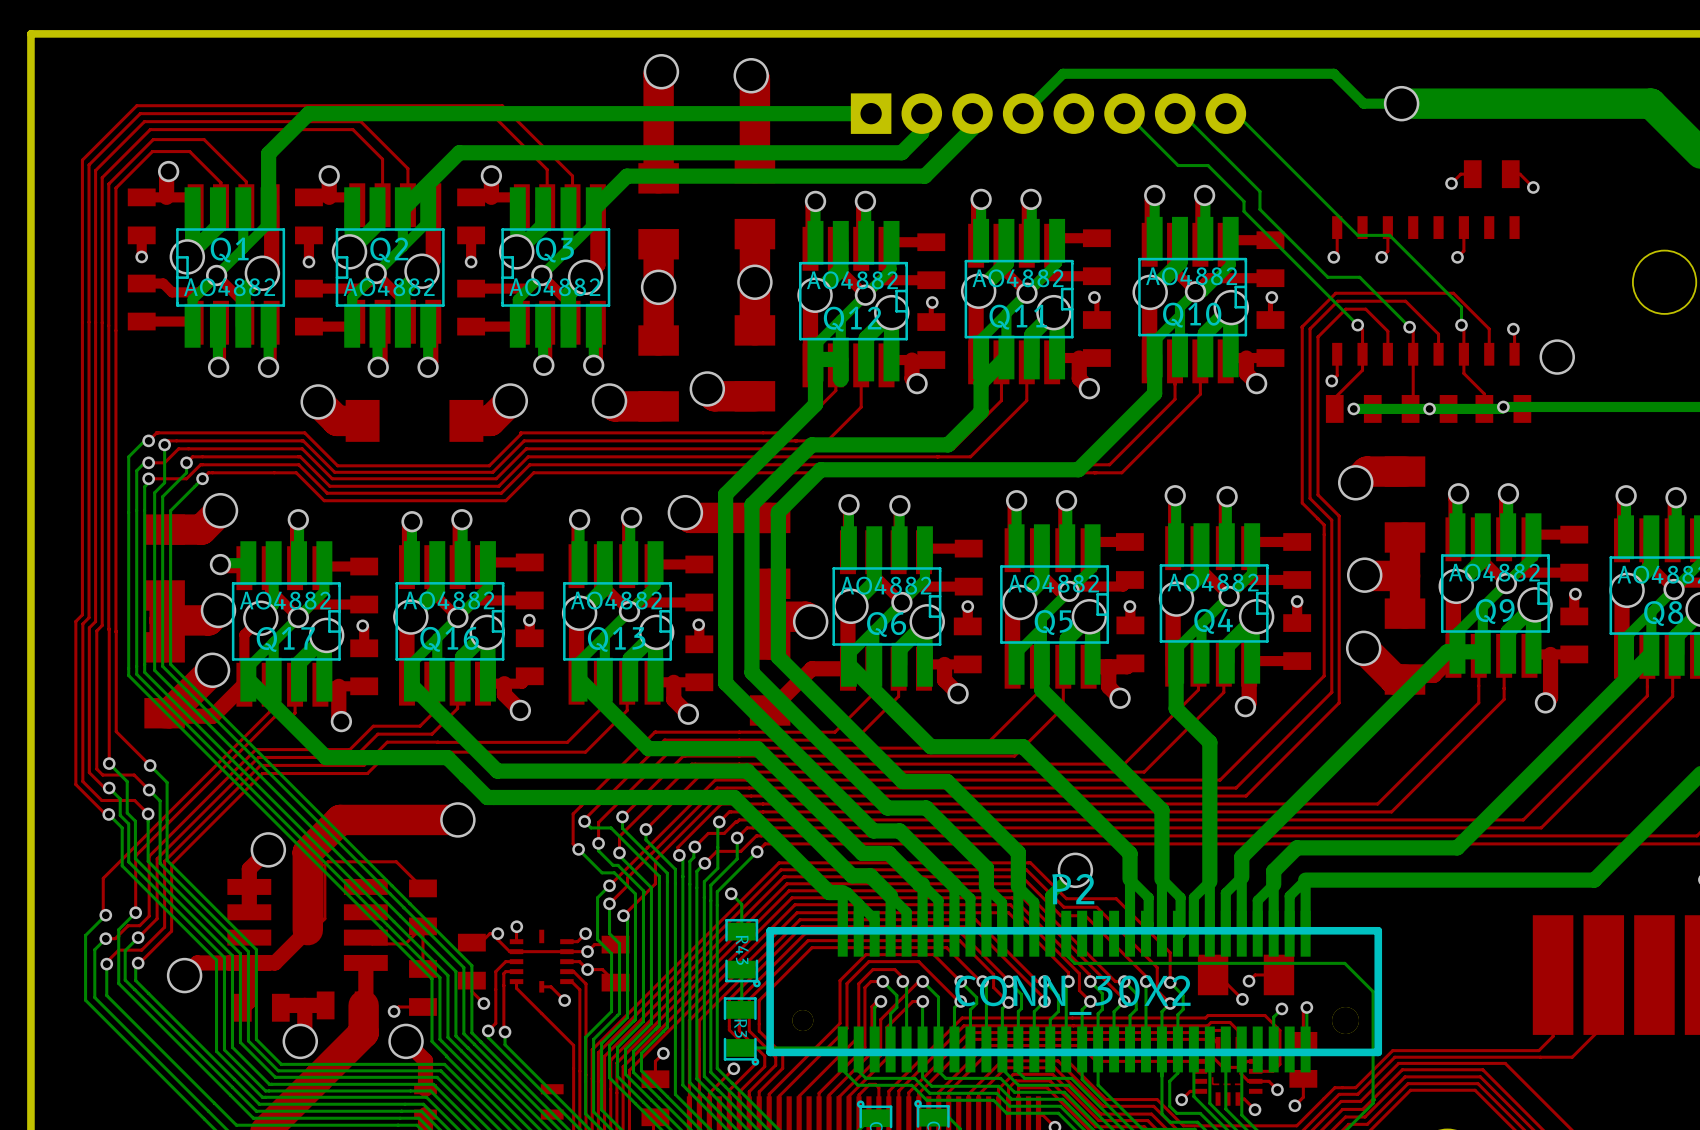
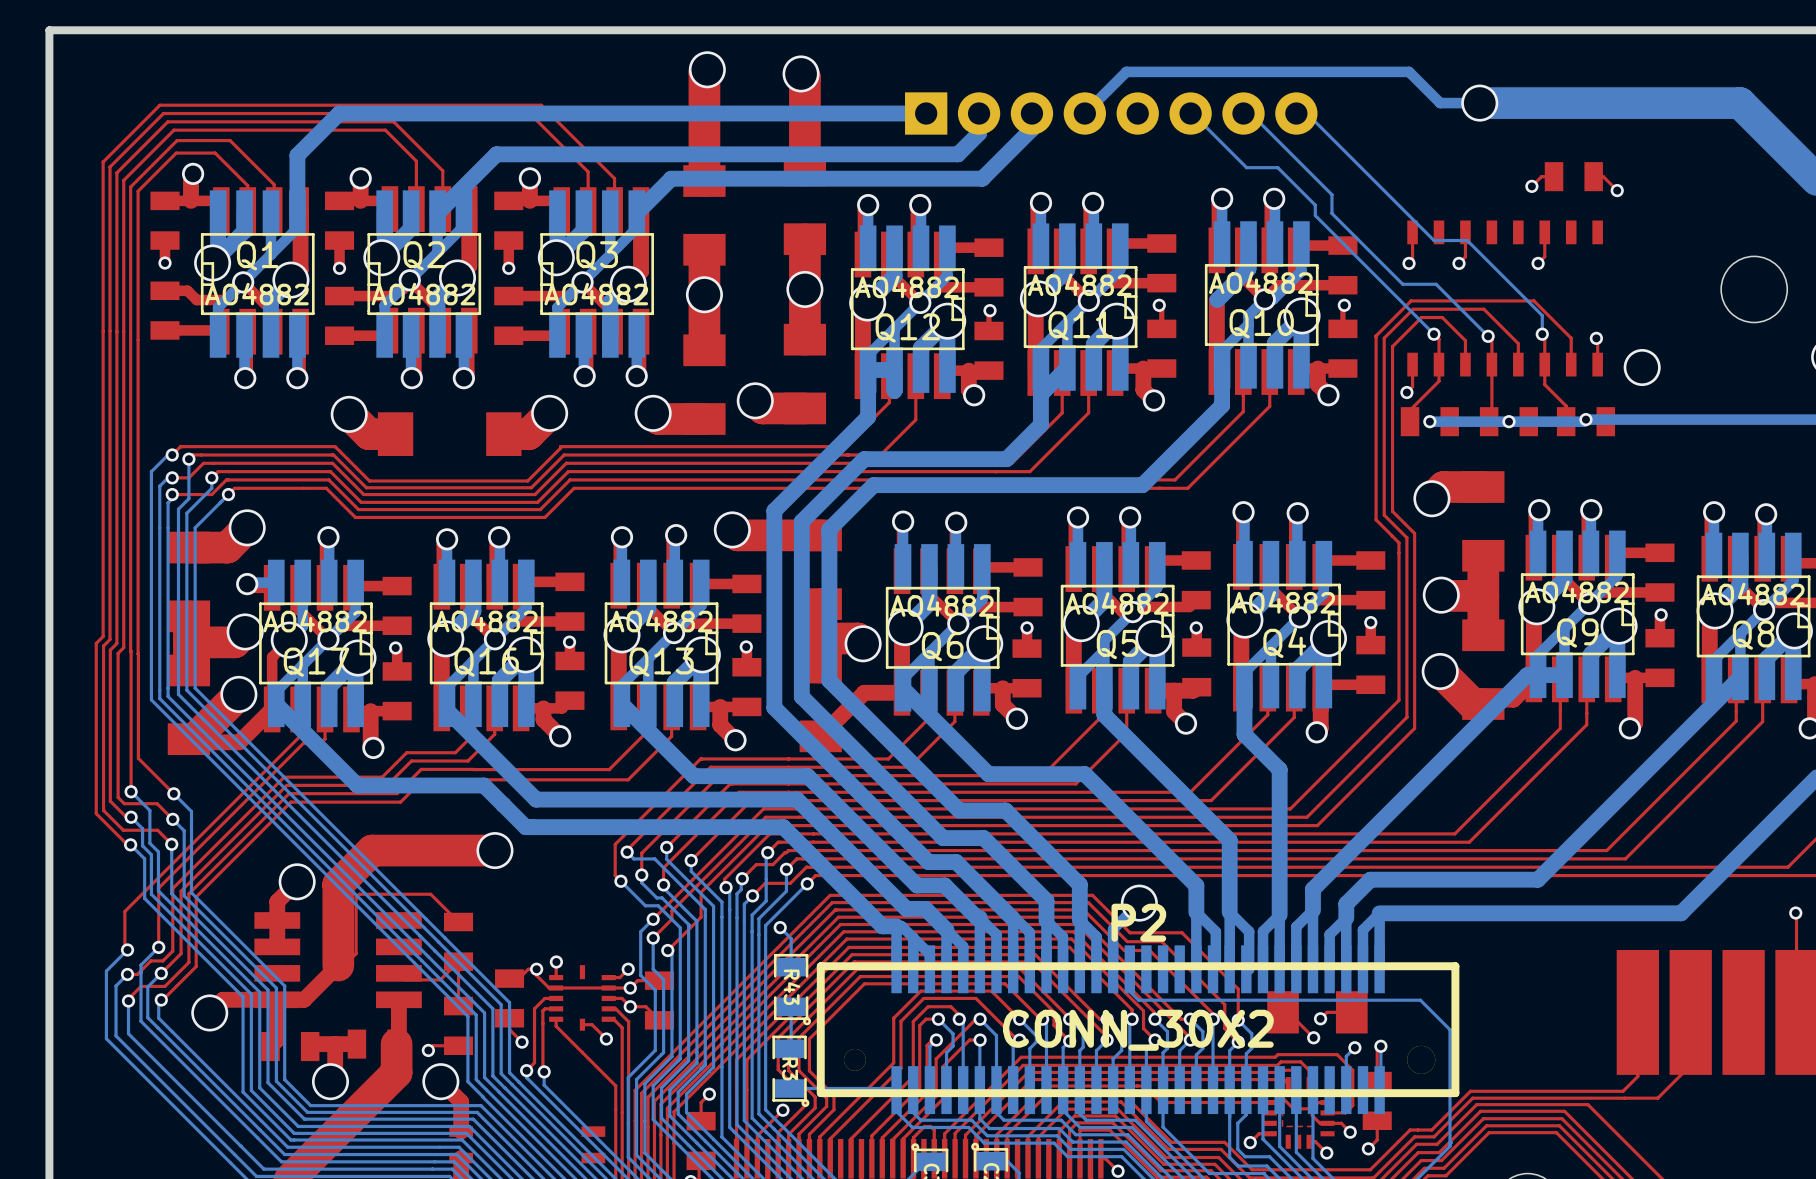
via: (1150, 292) -> none

